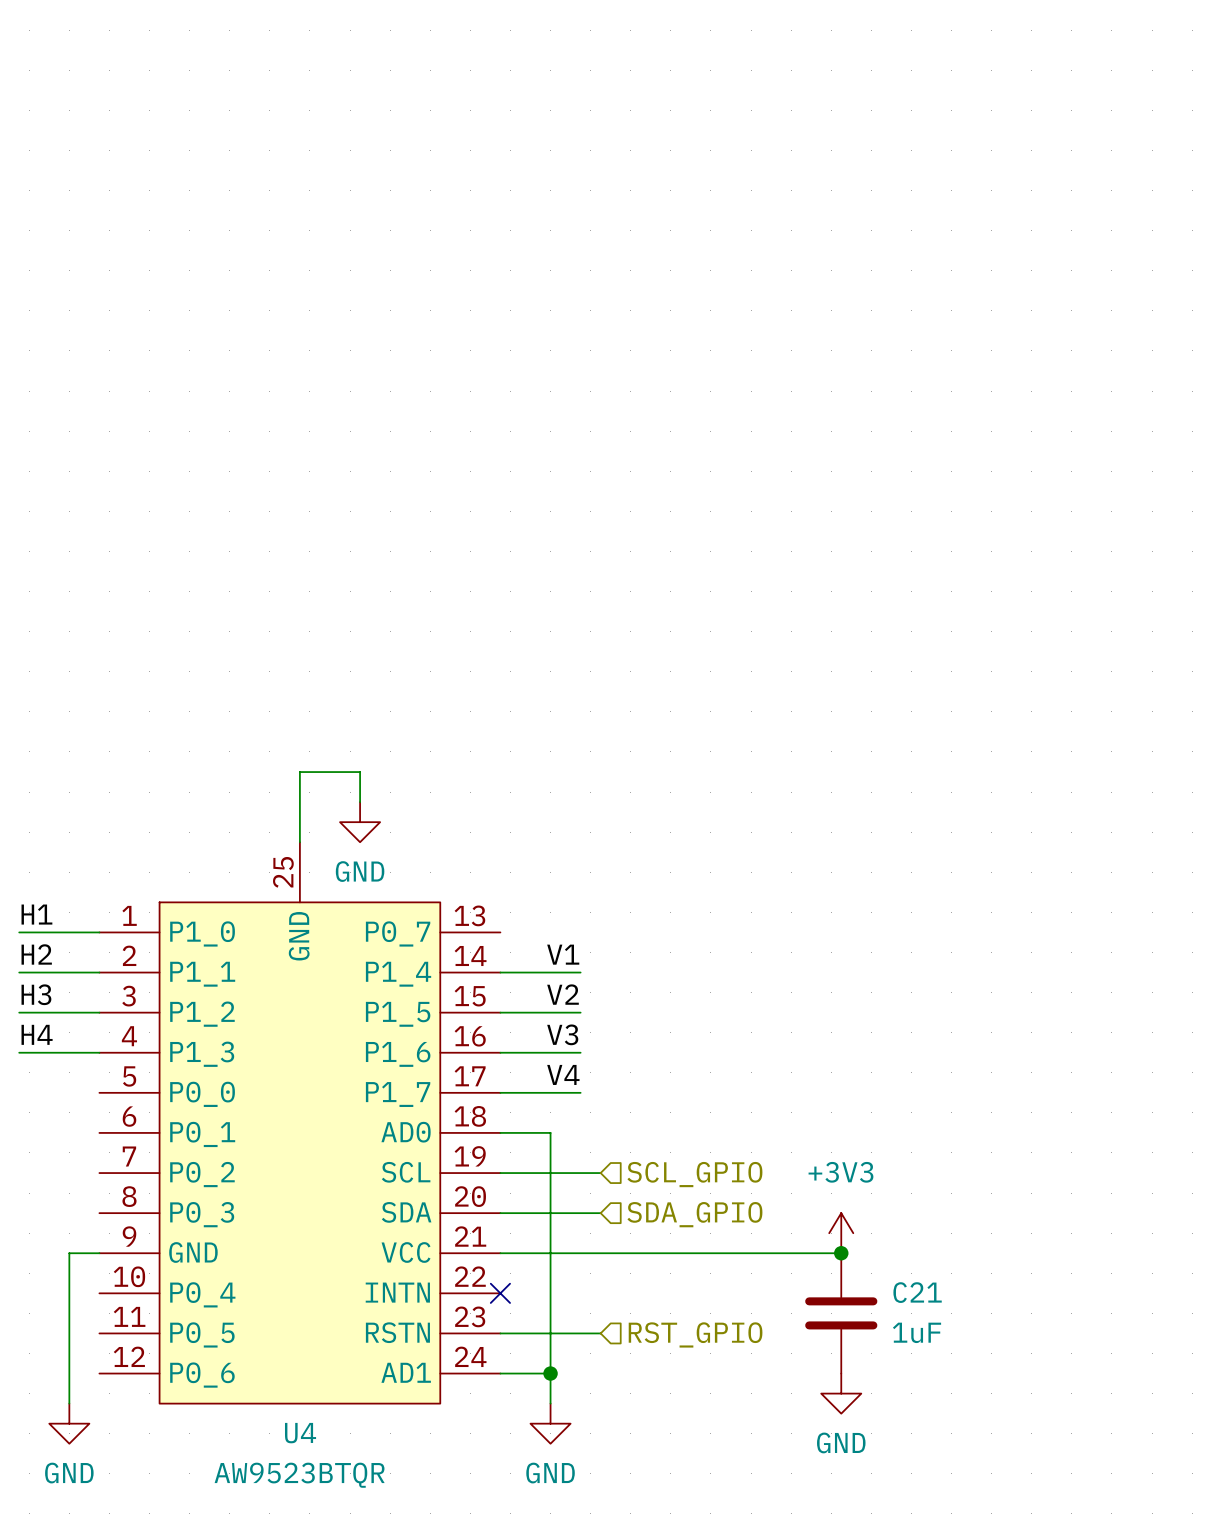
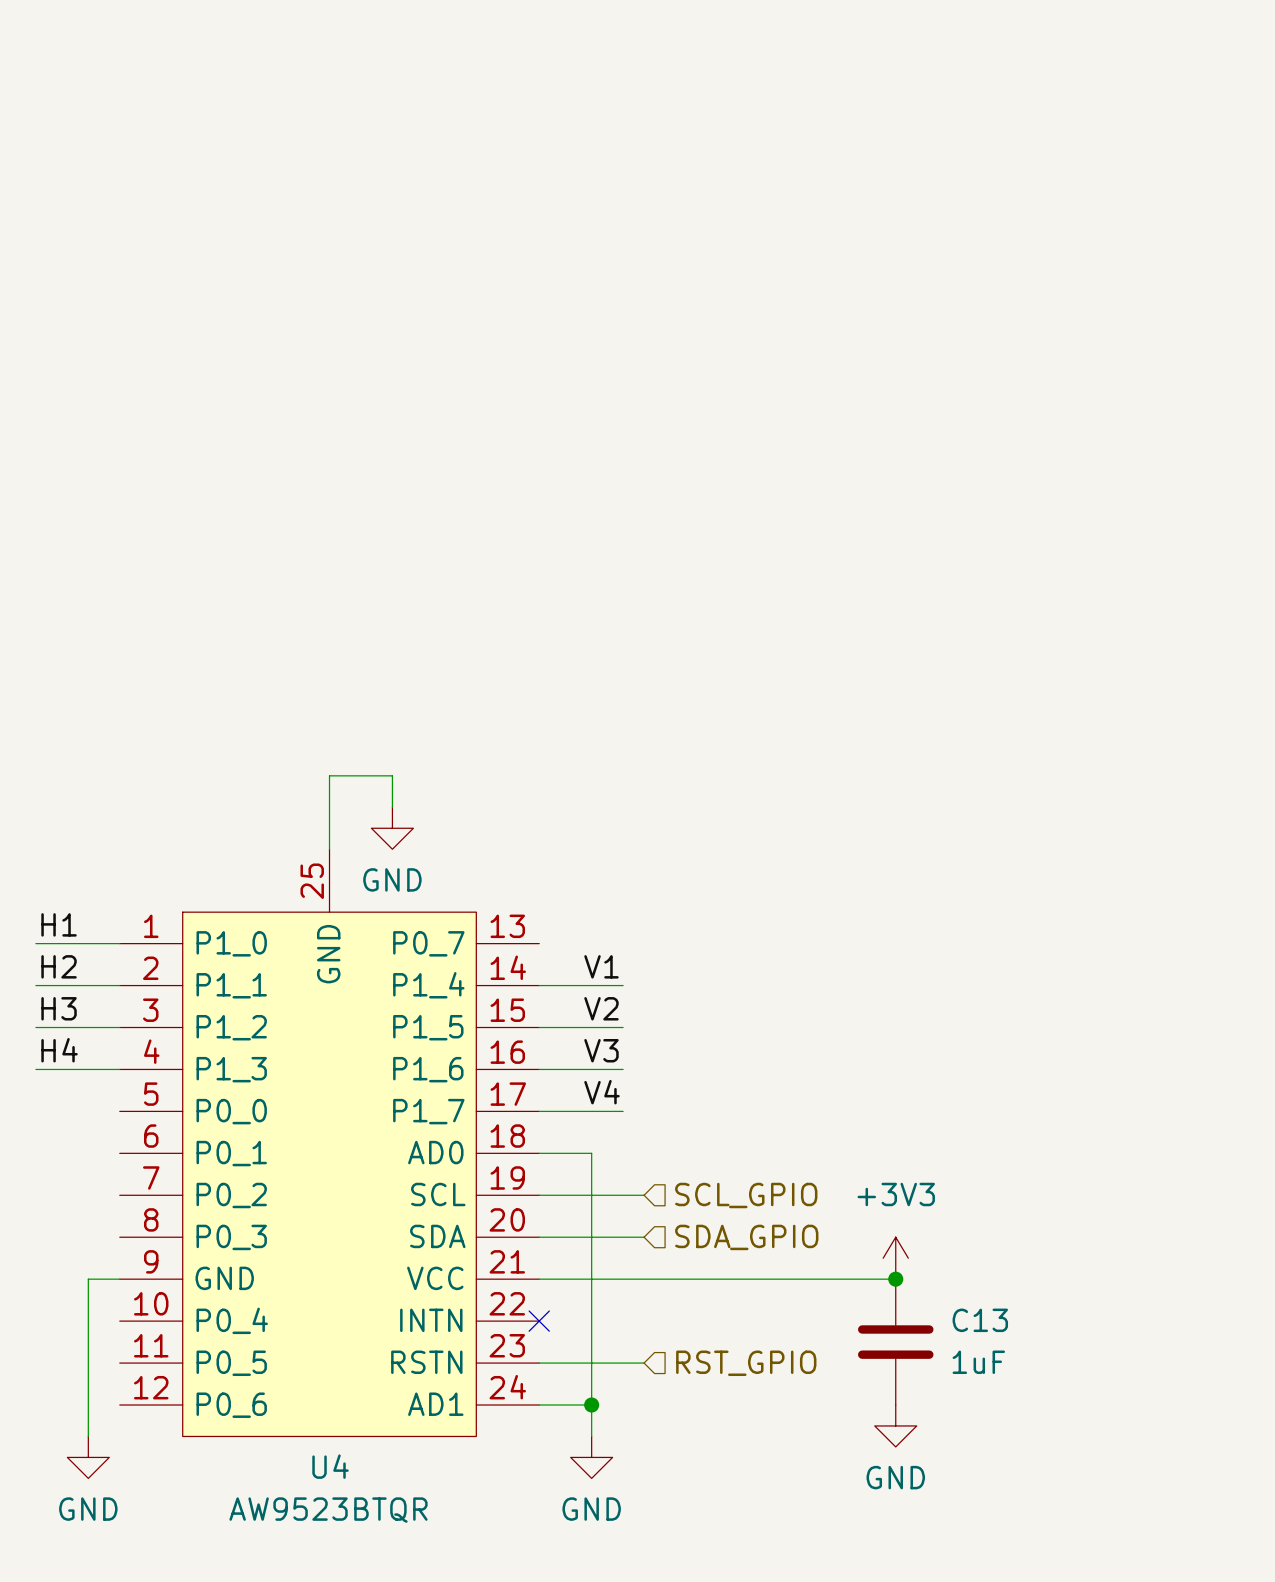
C21 name: C21 (917, 1292) -> C13 (980, 1320)

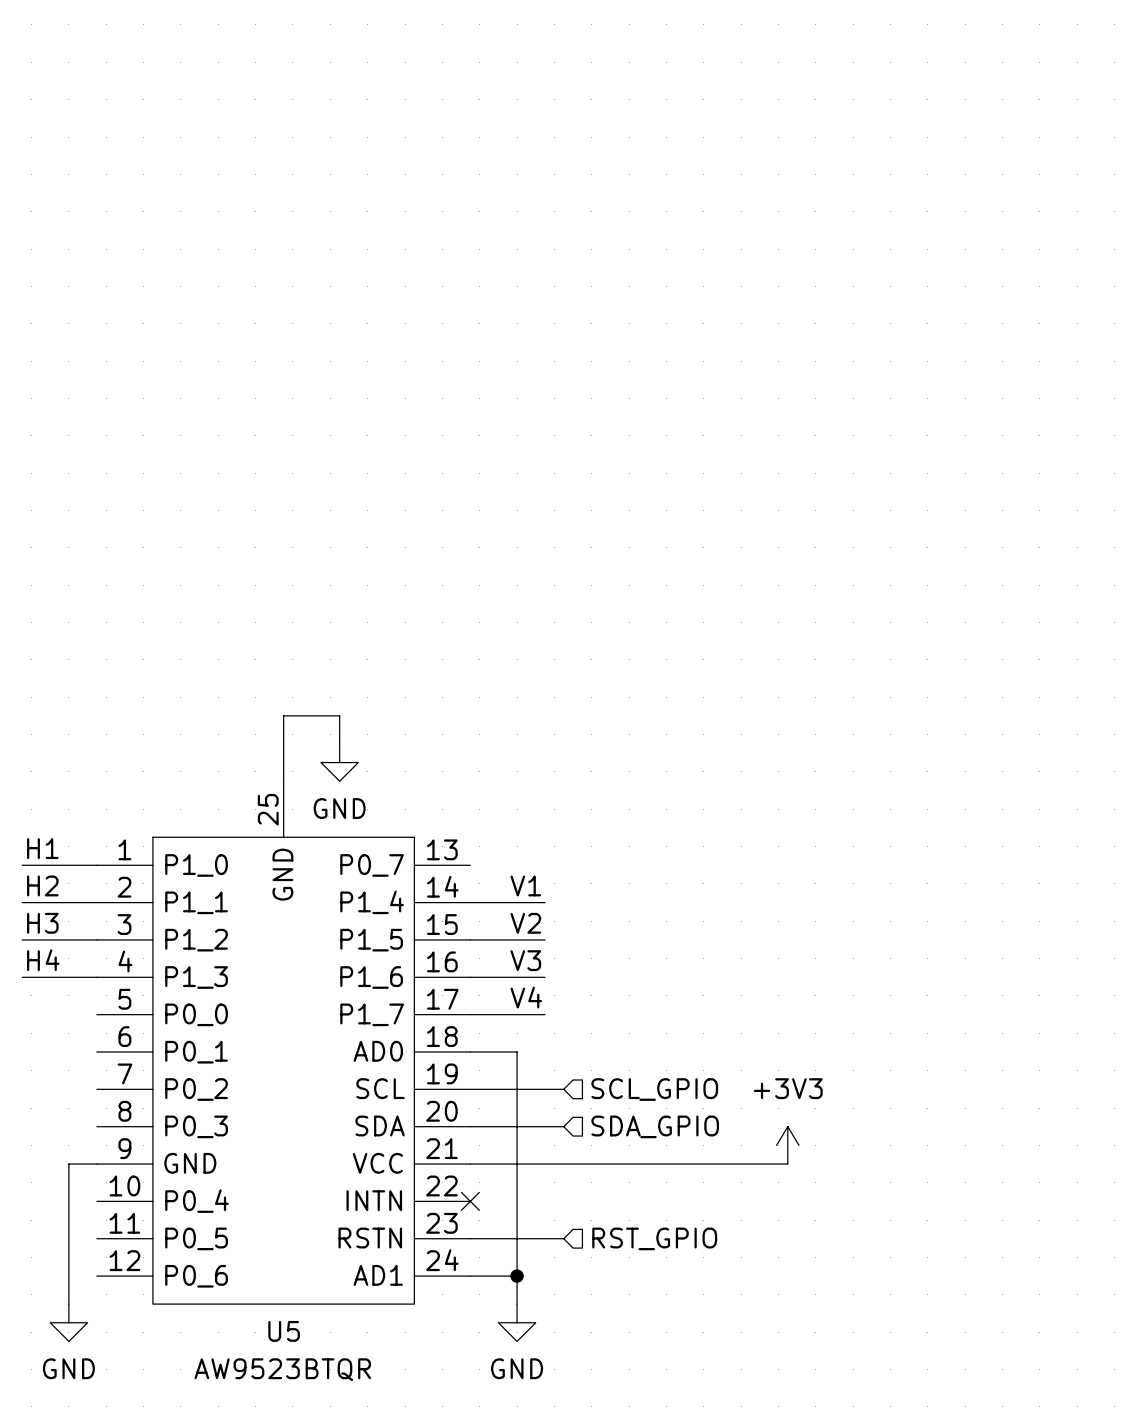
junction: (895, 1279) -> none
C13: 1uF (895, 1342) -> none
power symbol: GND (895, 1425) -> none
U4 name: U4 (330, 1466) -> U5 (284, 1331)

